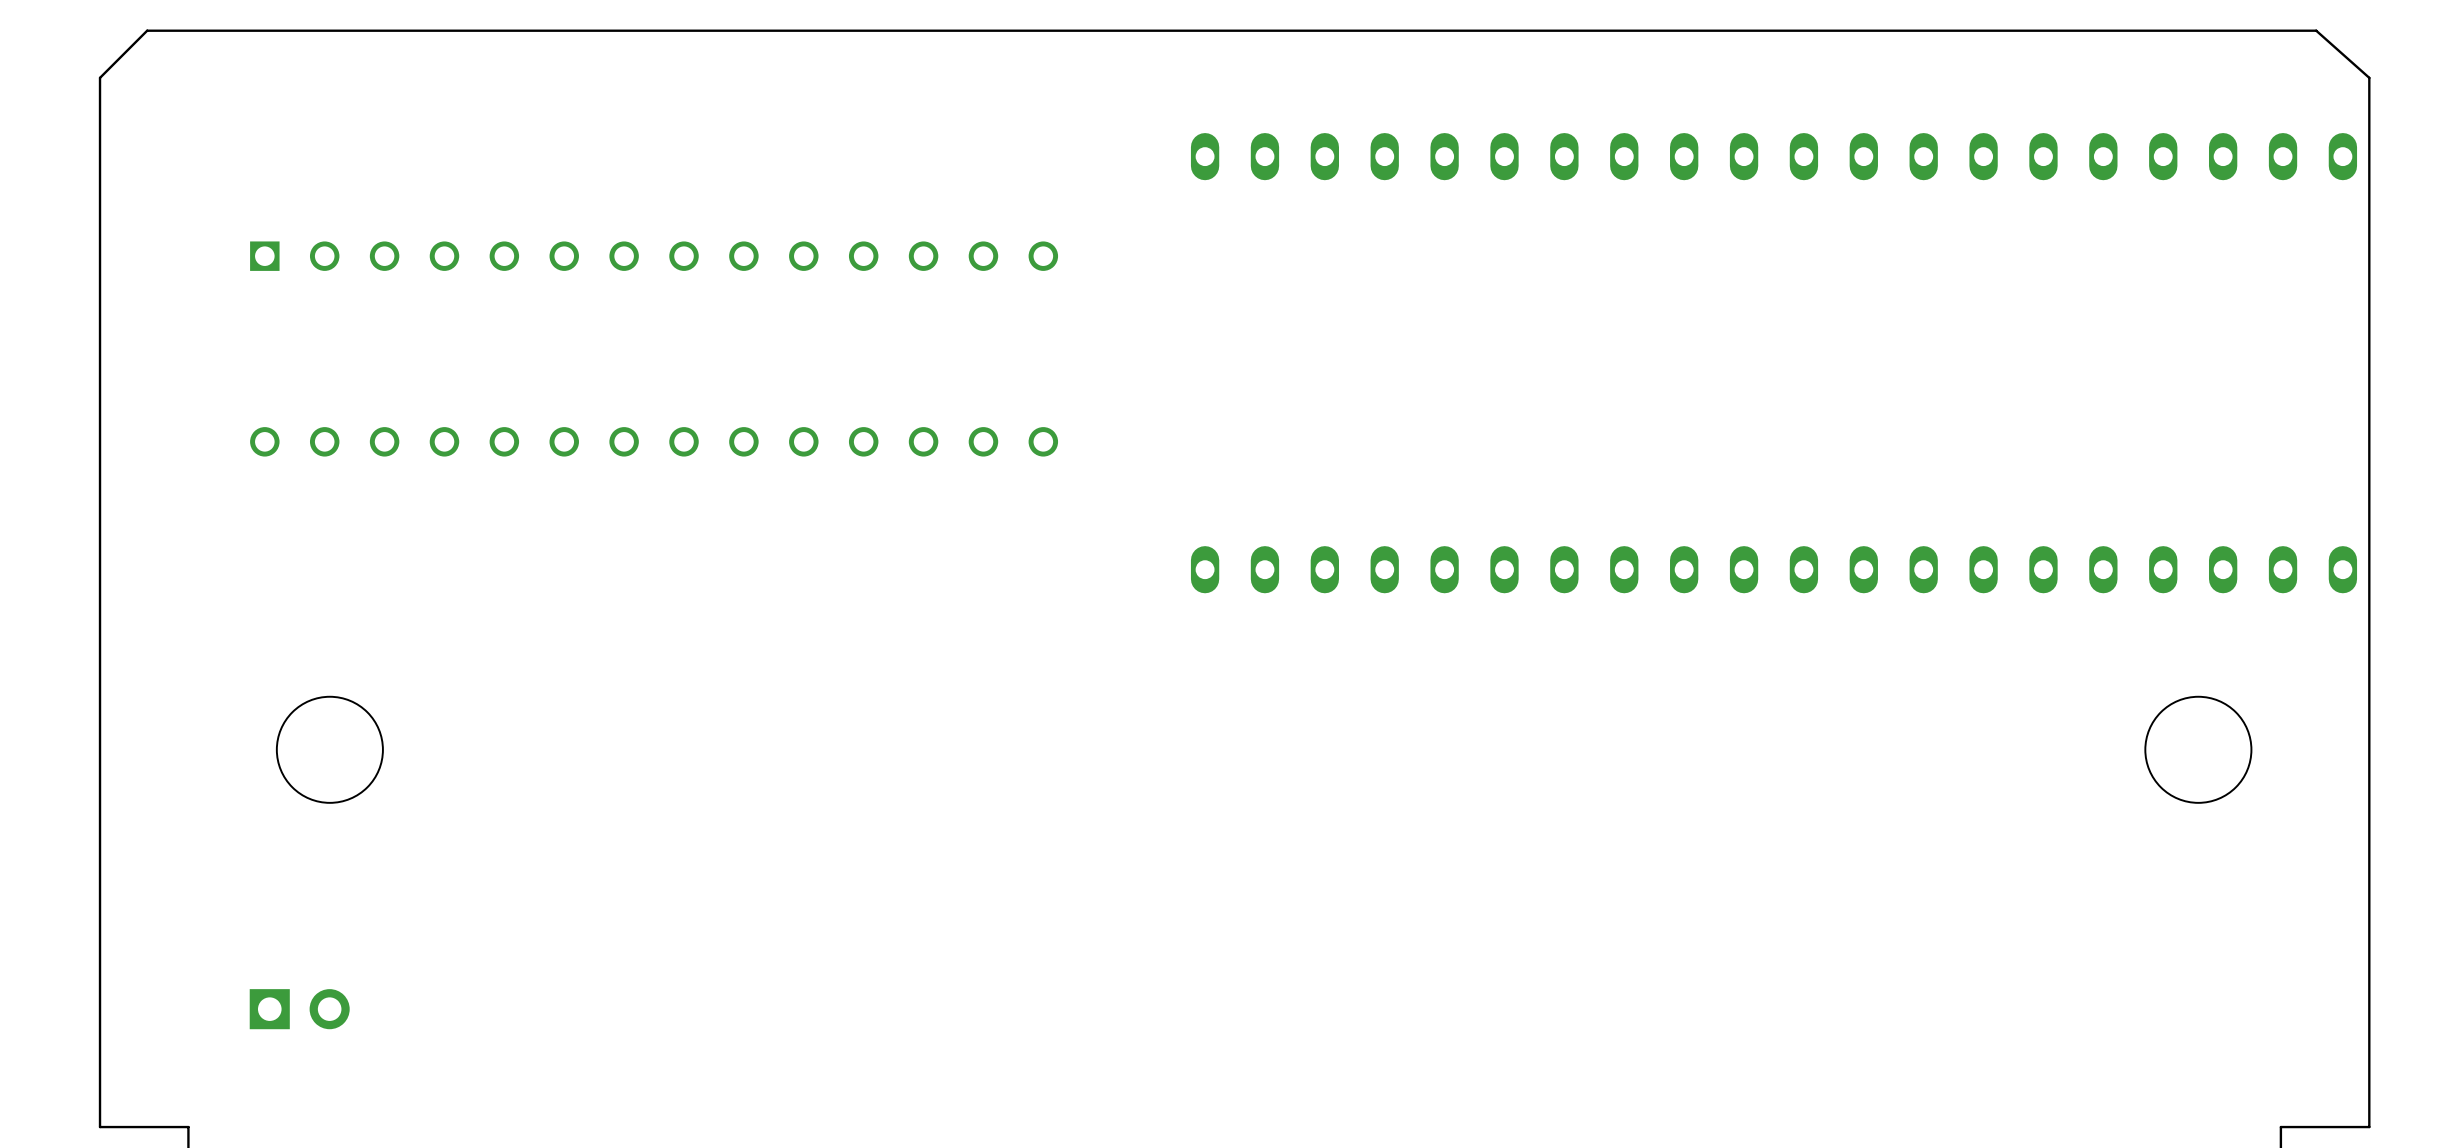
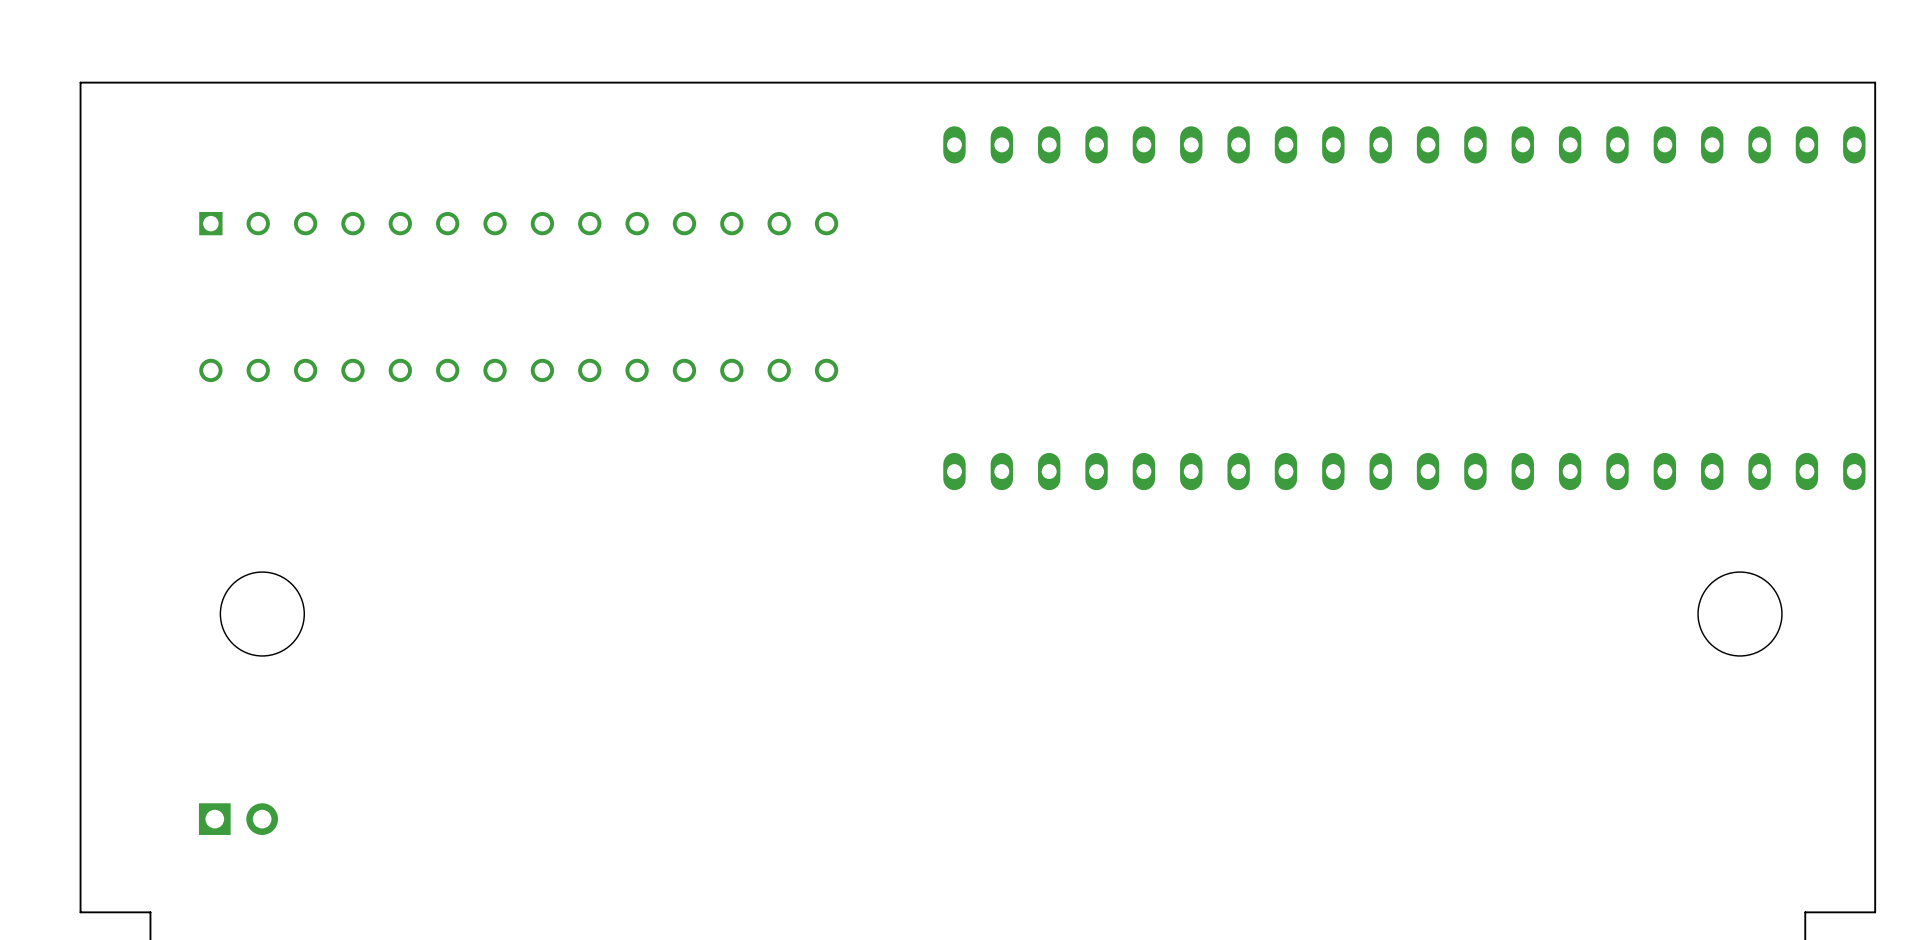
board edge: (2369, 77) (2316, 30) (147, 30) (100, 77) -> (1875, 82) (80, 82)

